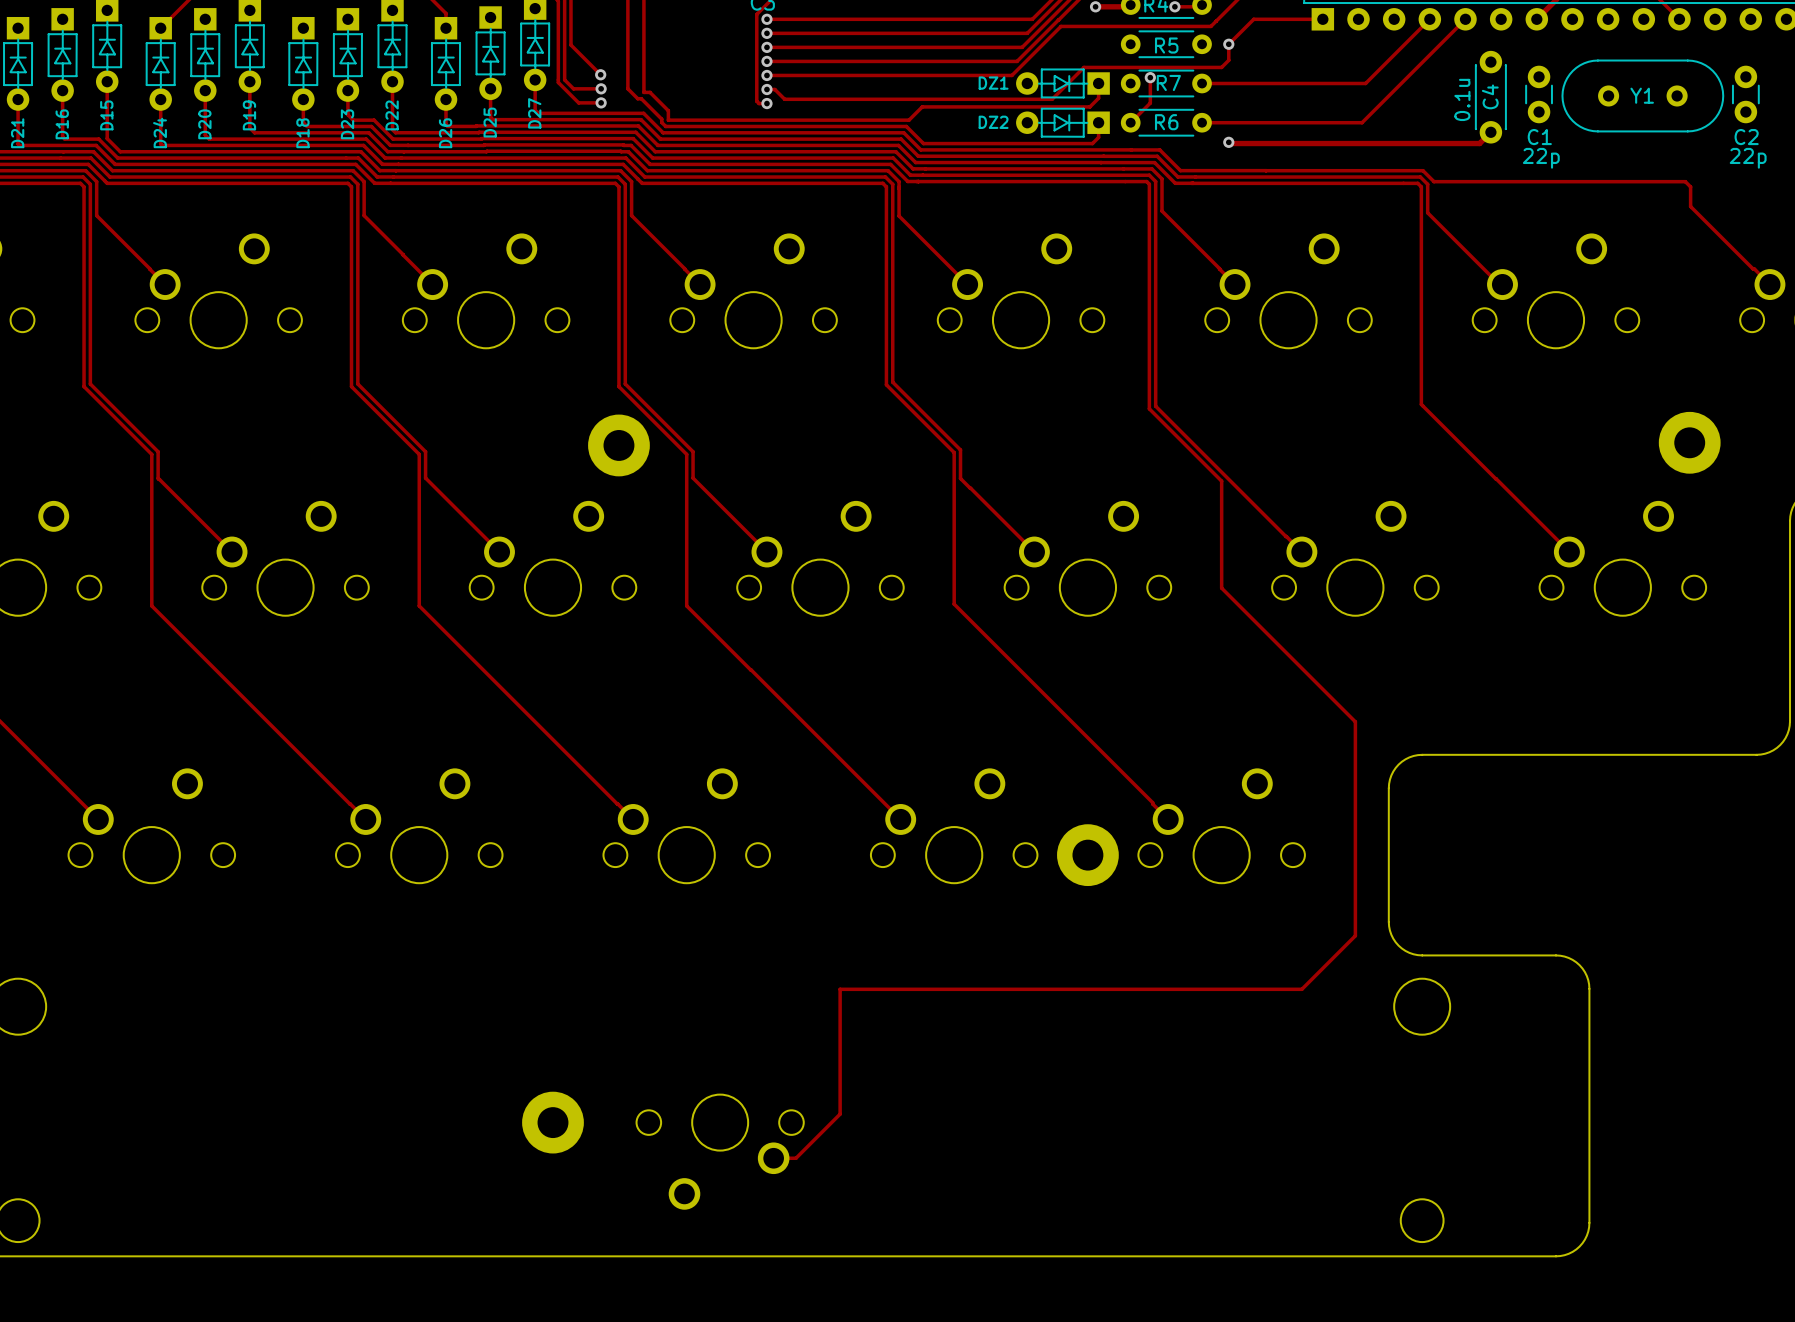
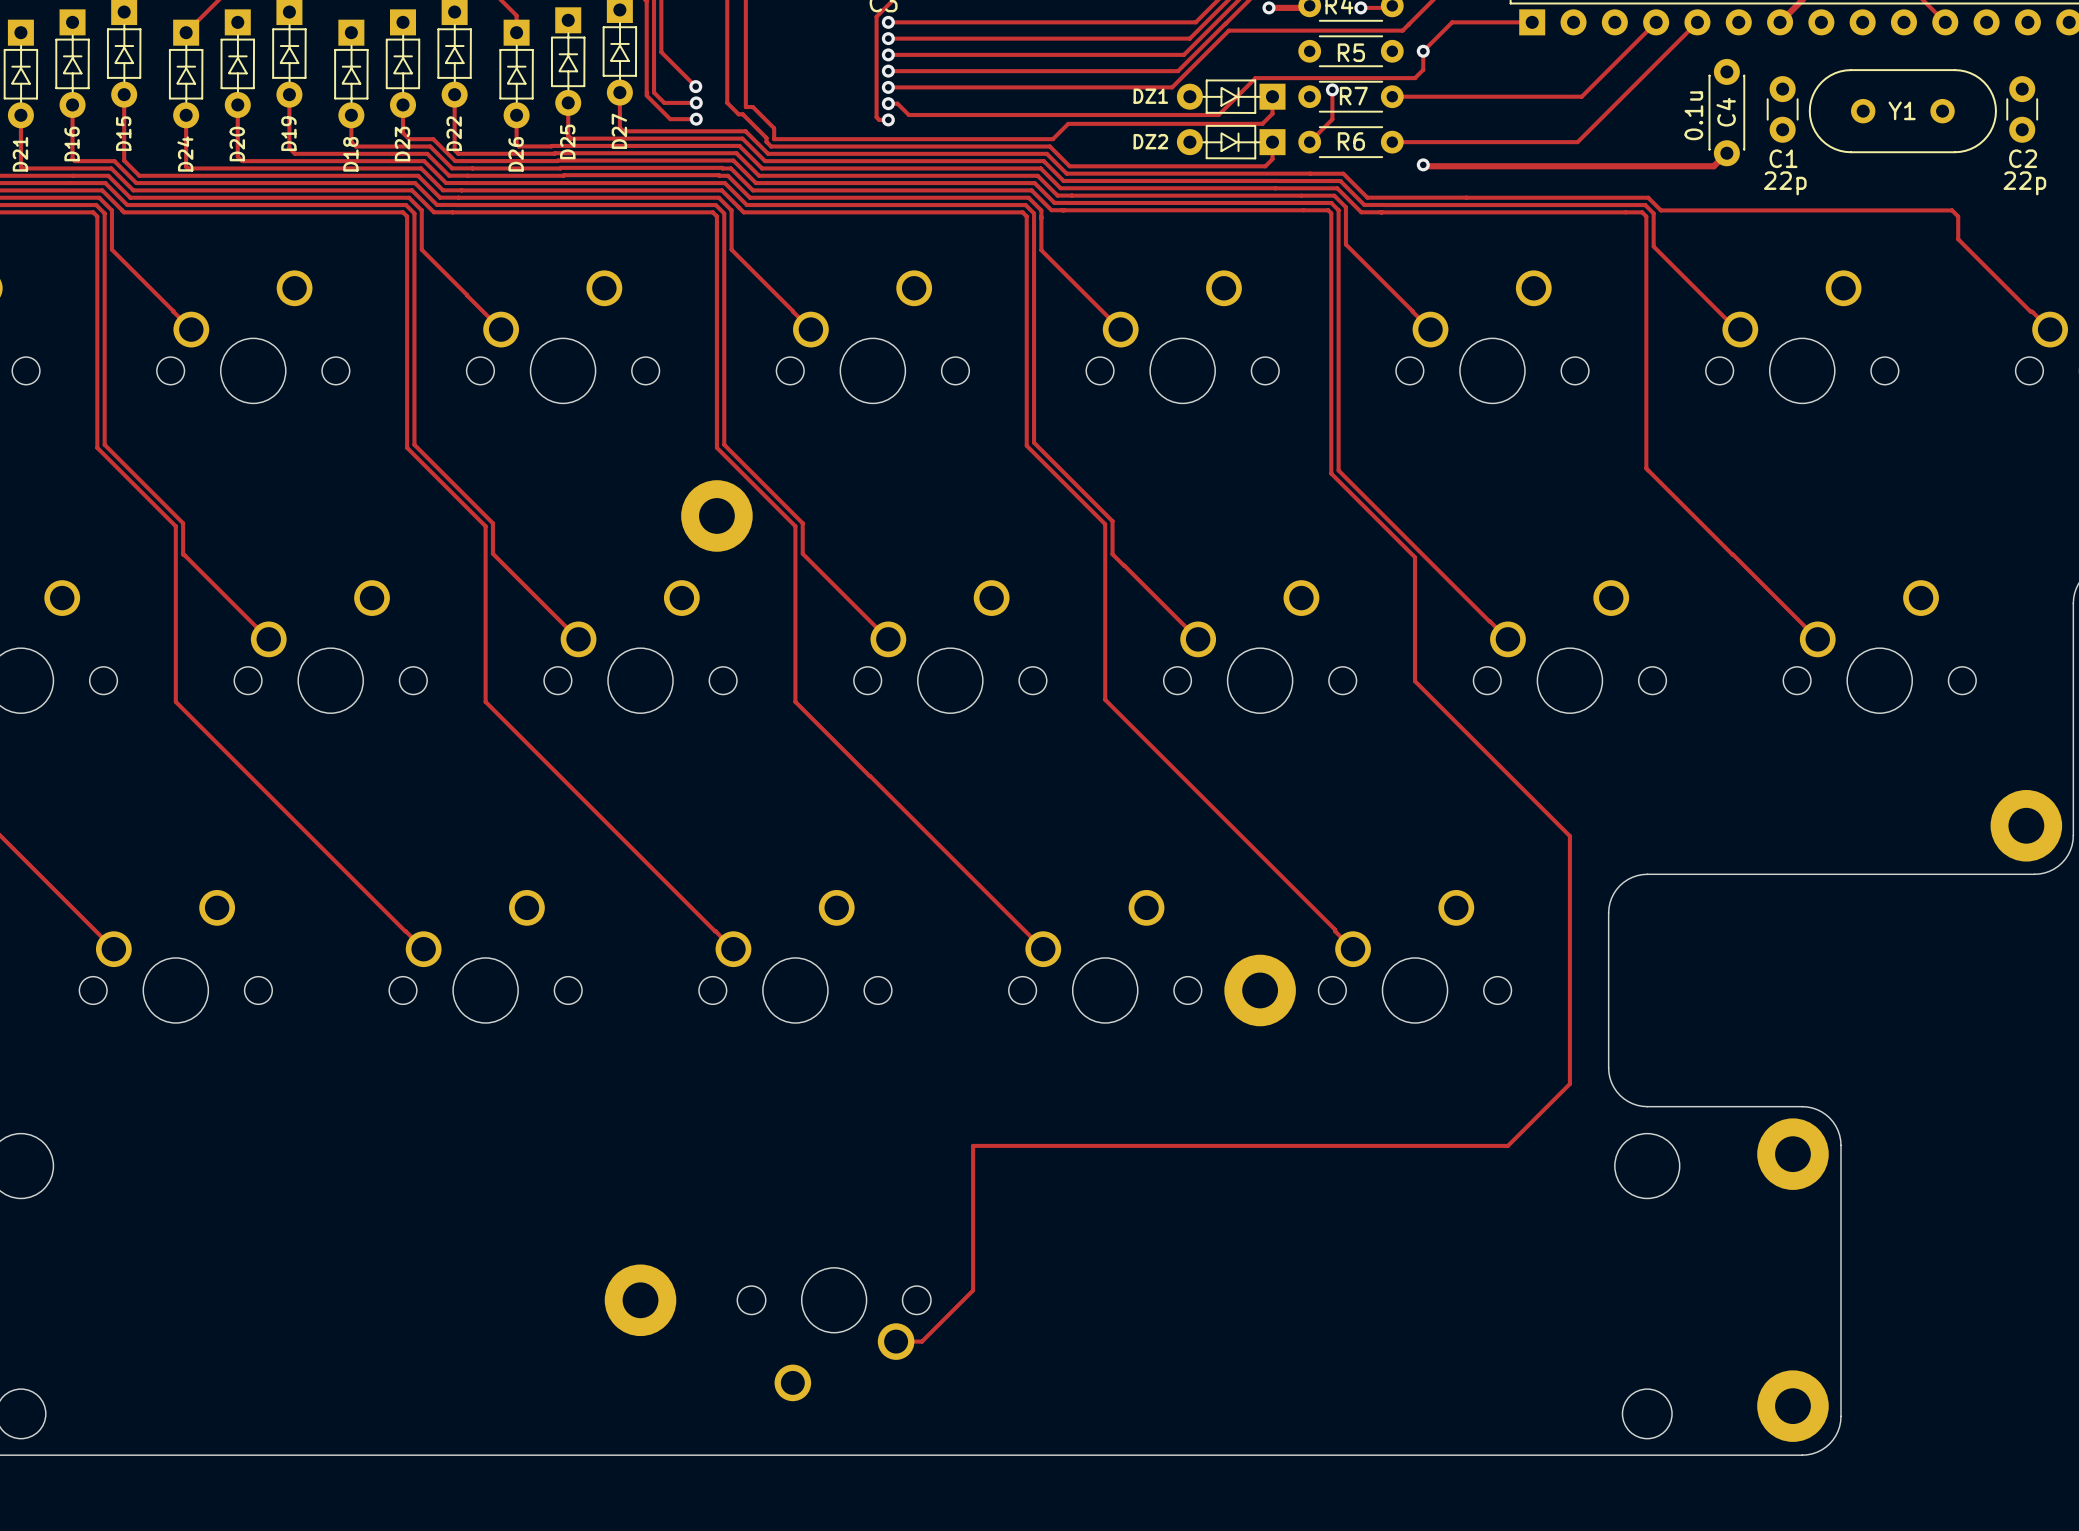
part position: (1689, 442) -> (2026, 825)
part: none -> (1792, 1154)
part: none -> (1792, 1406)

